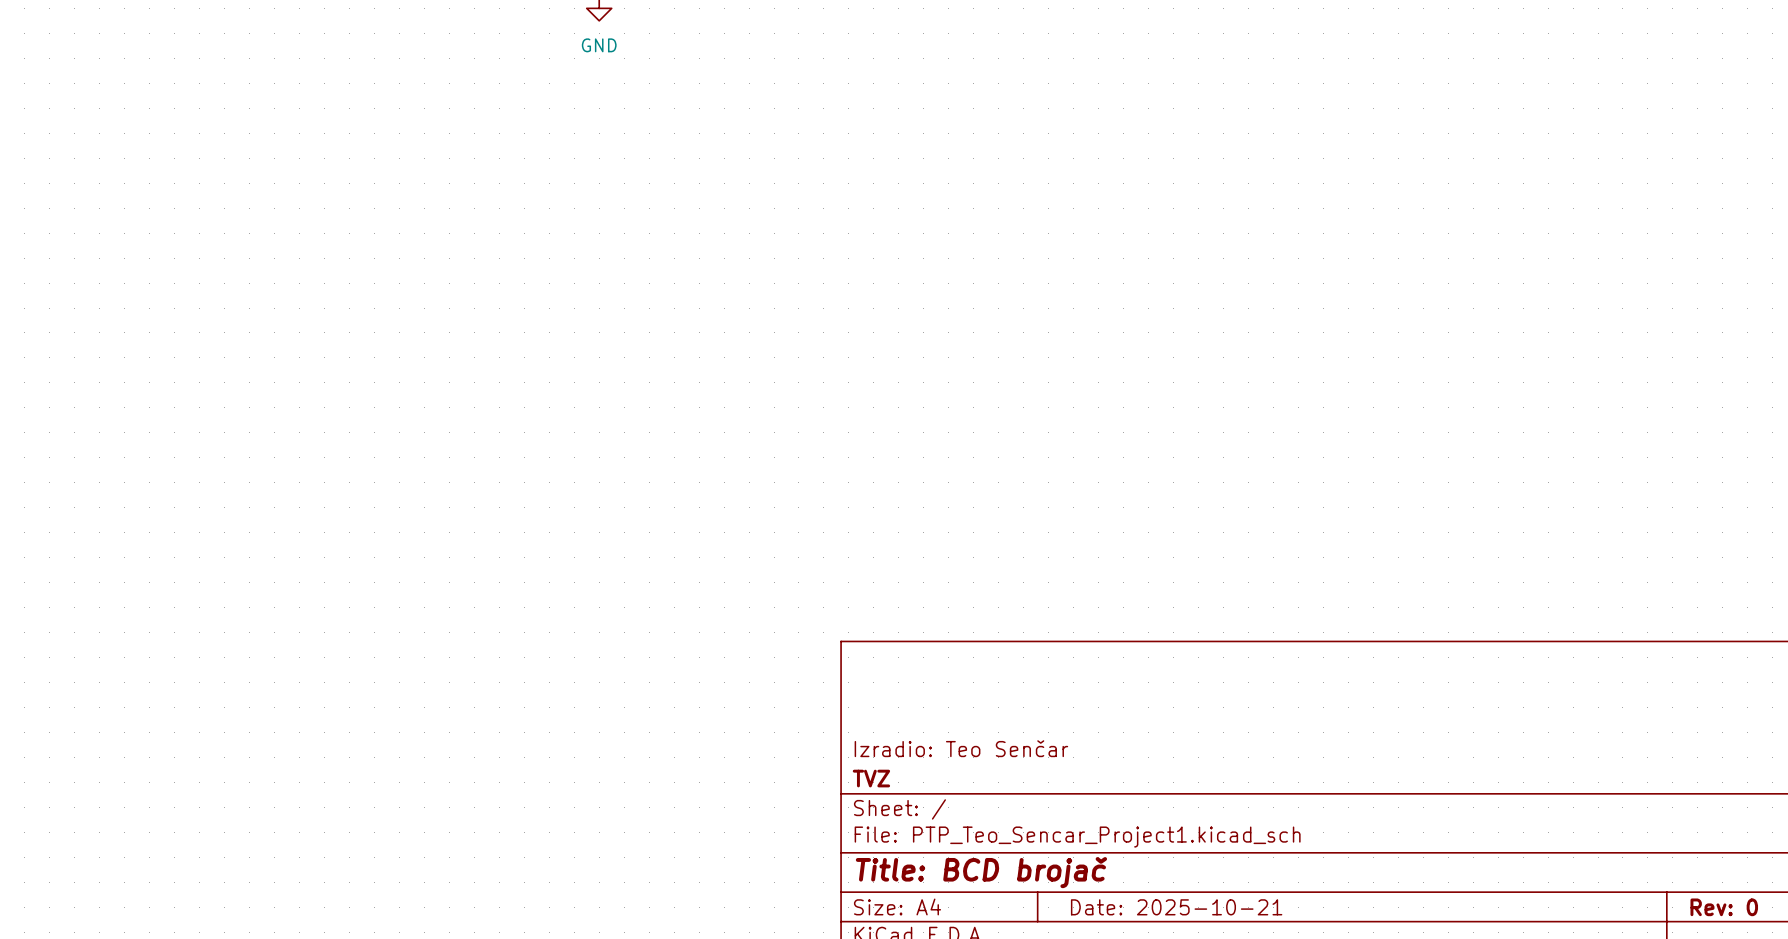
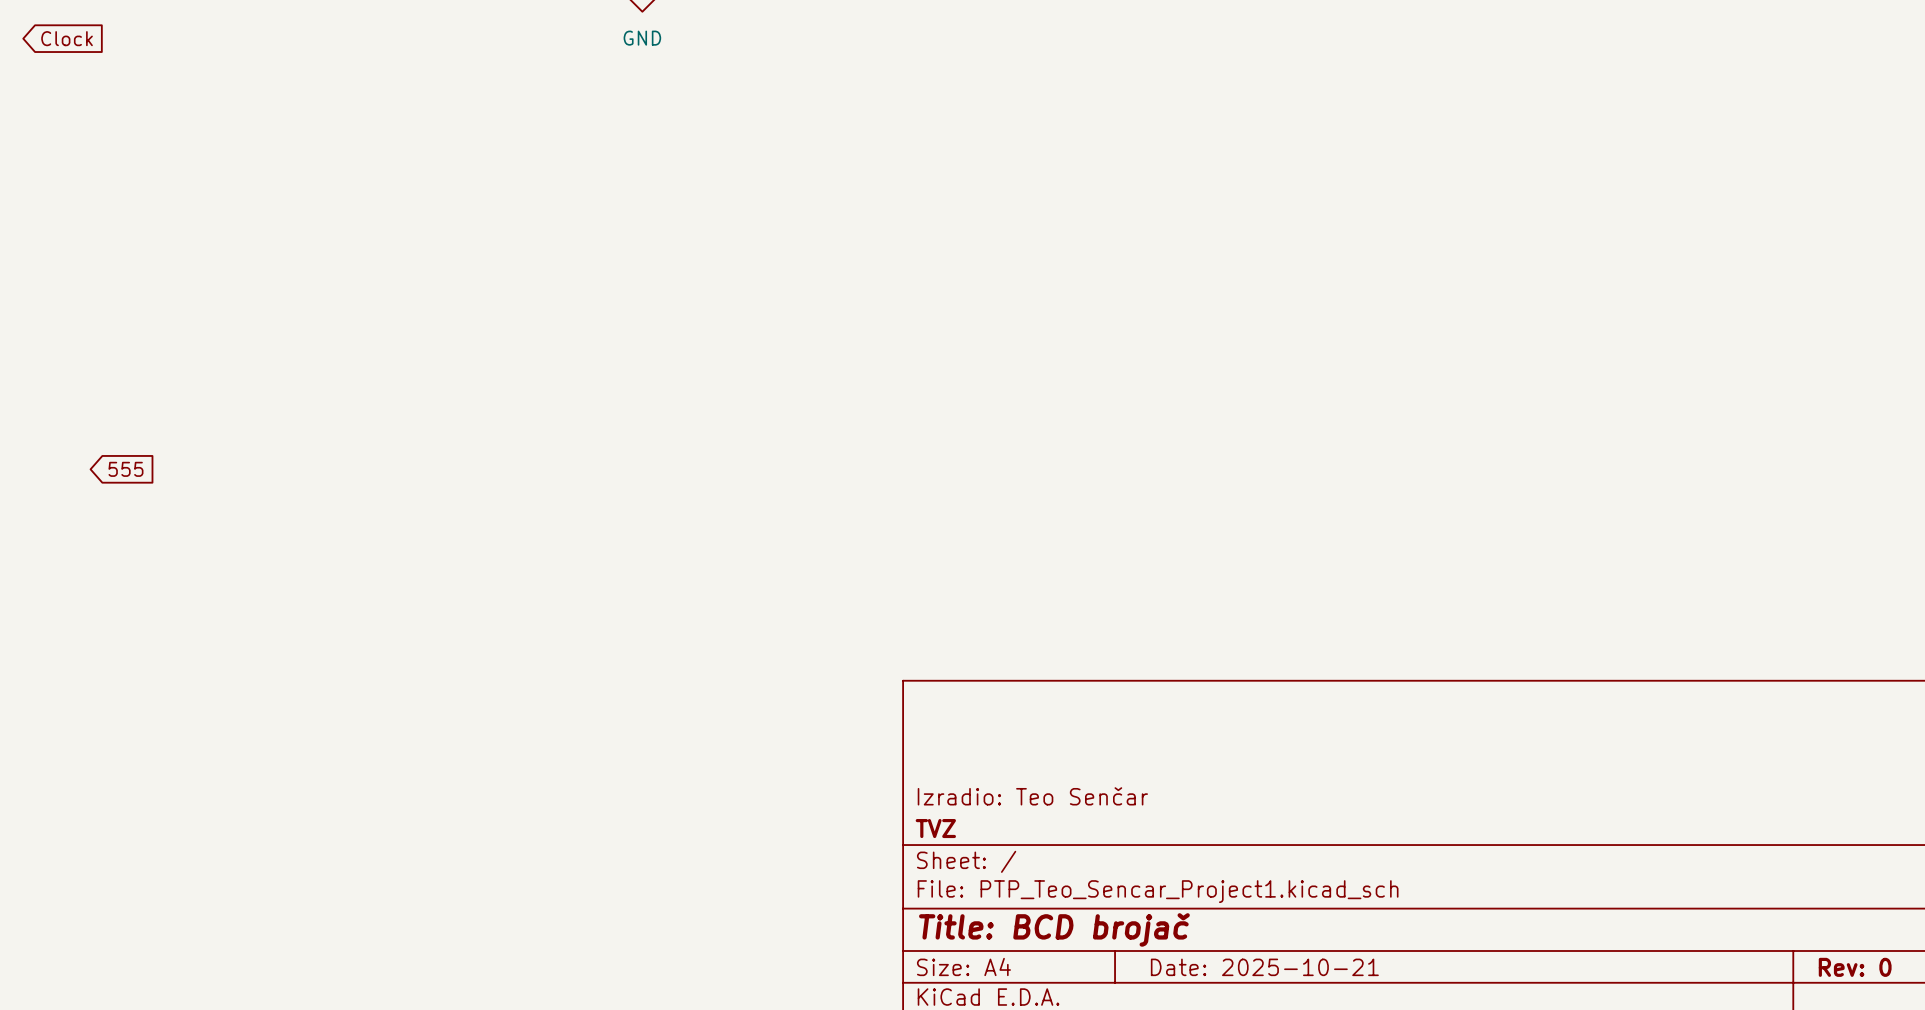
global label: none -> Clock (67, 38)
global label: none -> 555 (125, 469)

